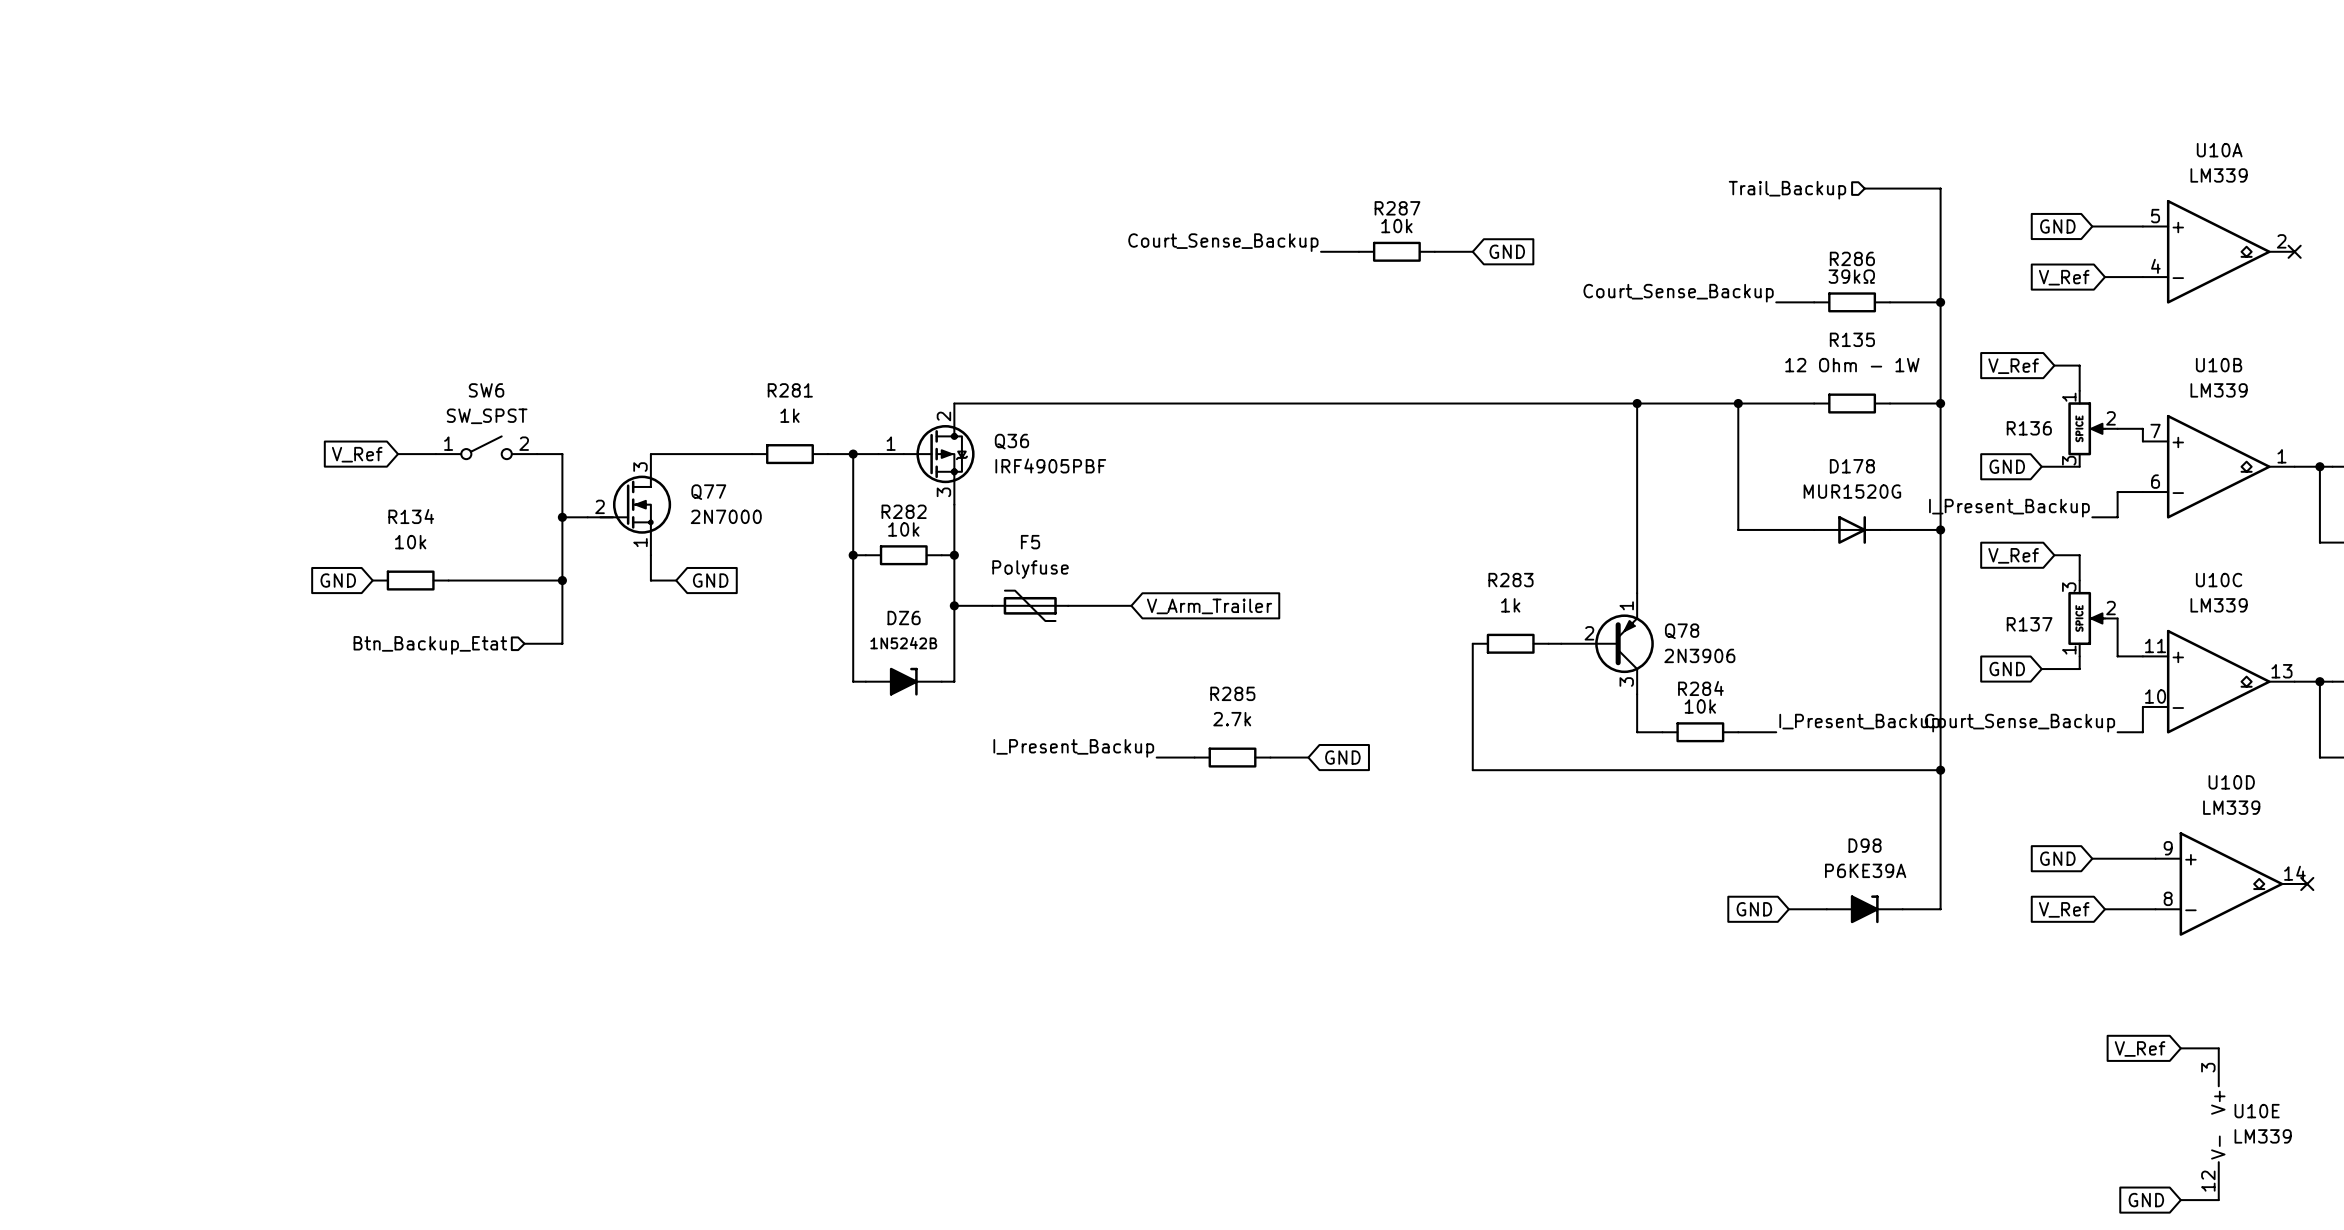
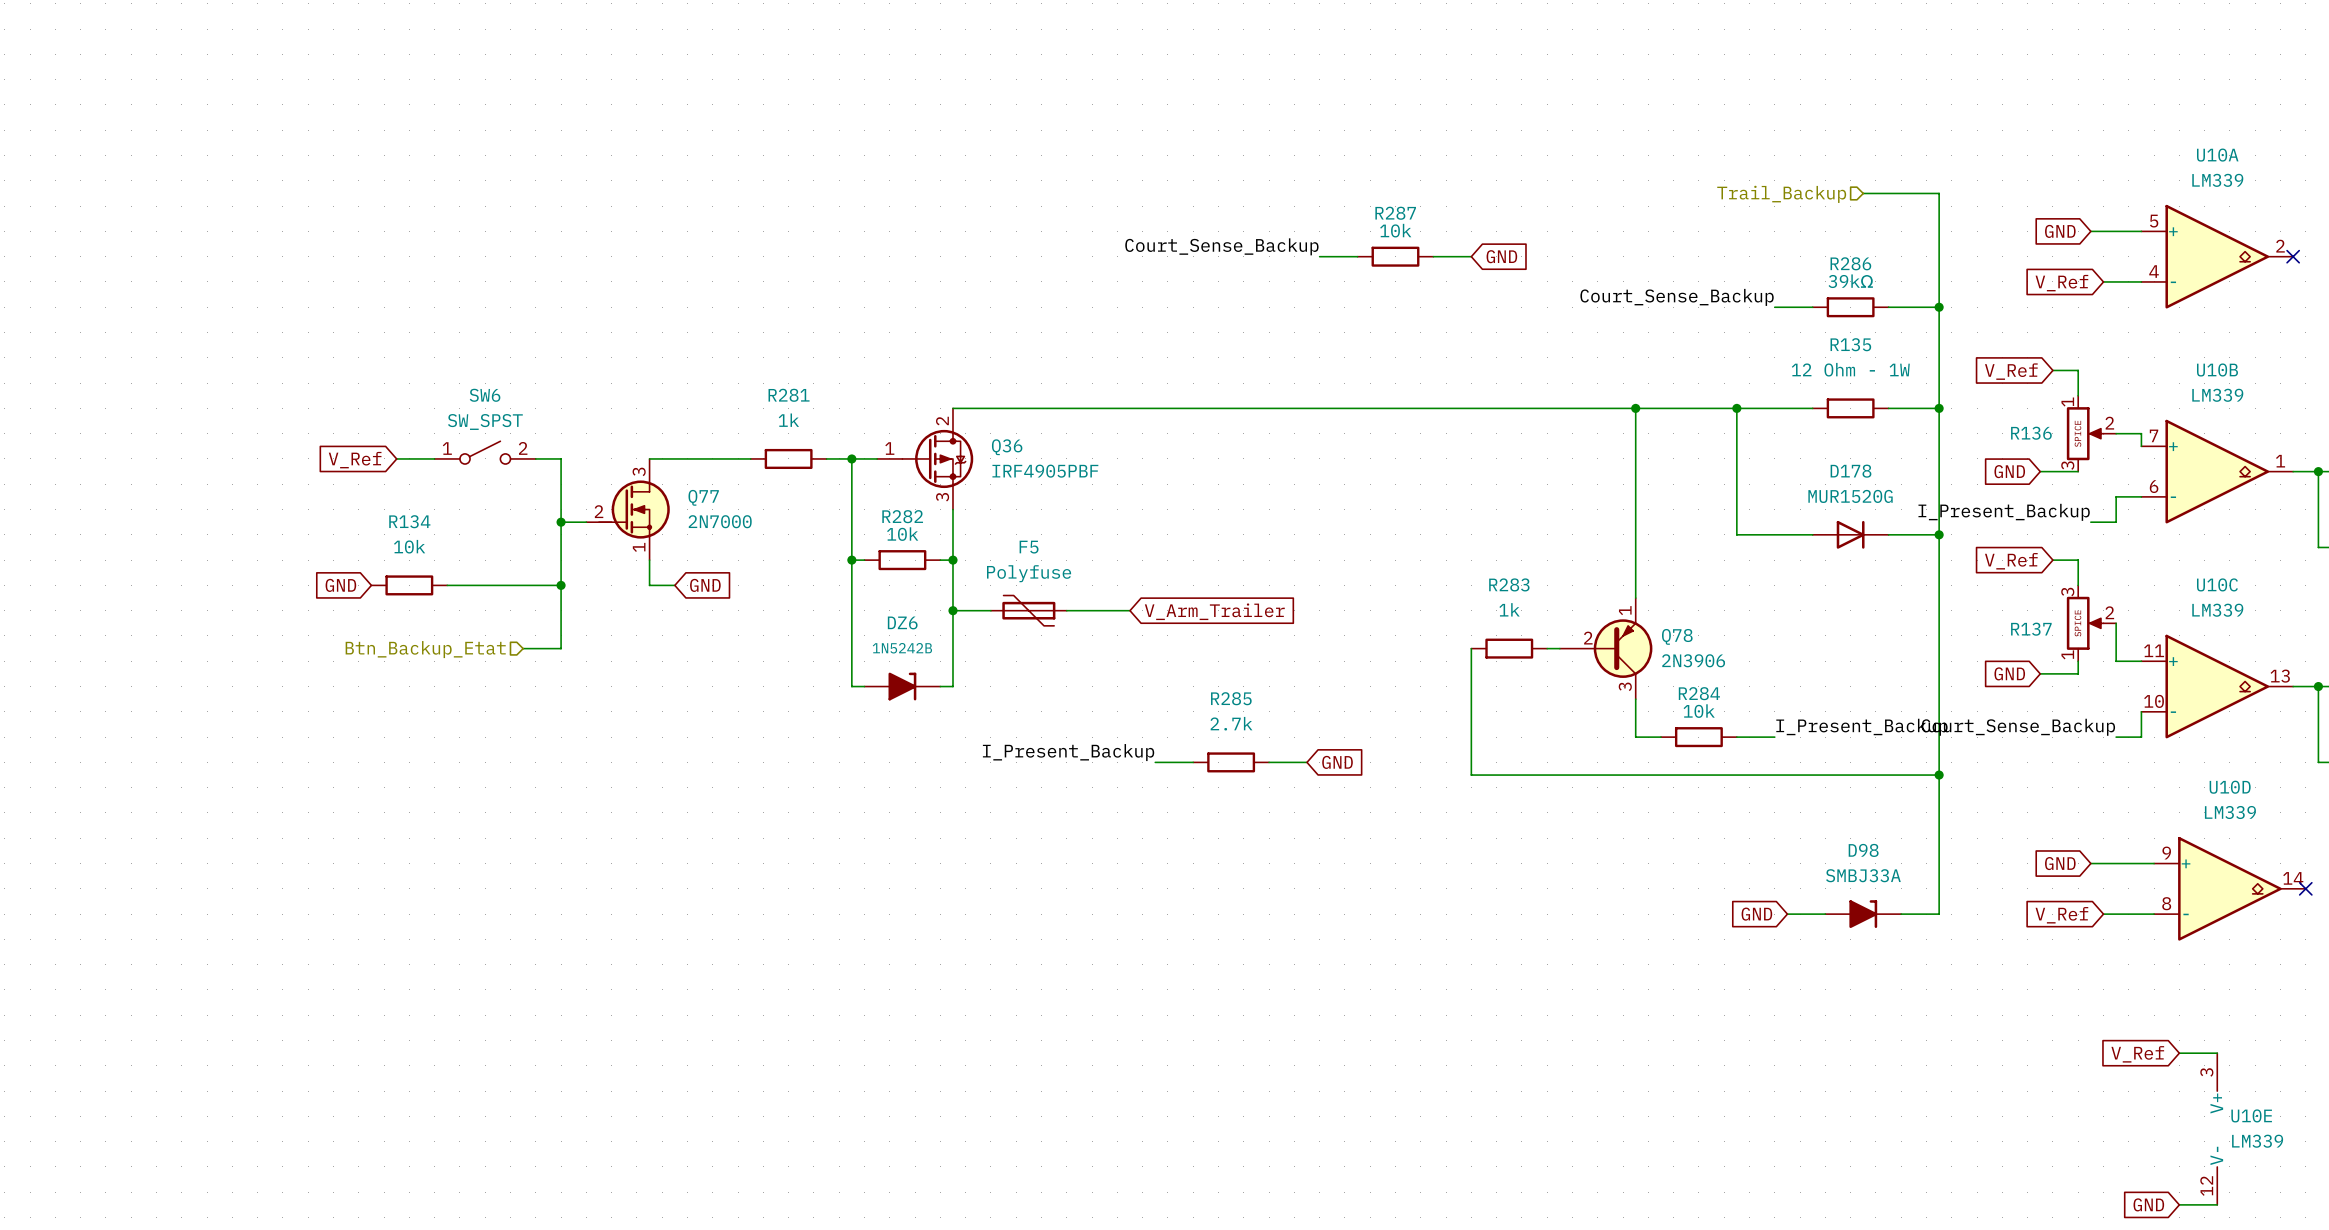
D98 value: P6KE39A (1865, 870) -> SMBJ33A (1863, 875)

